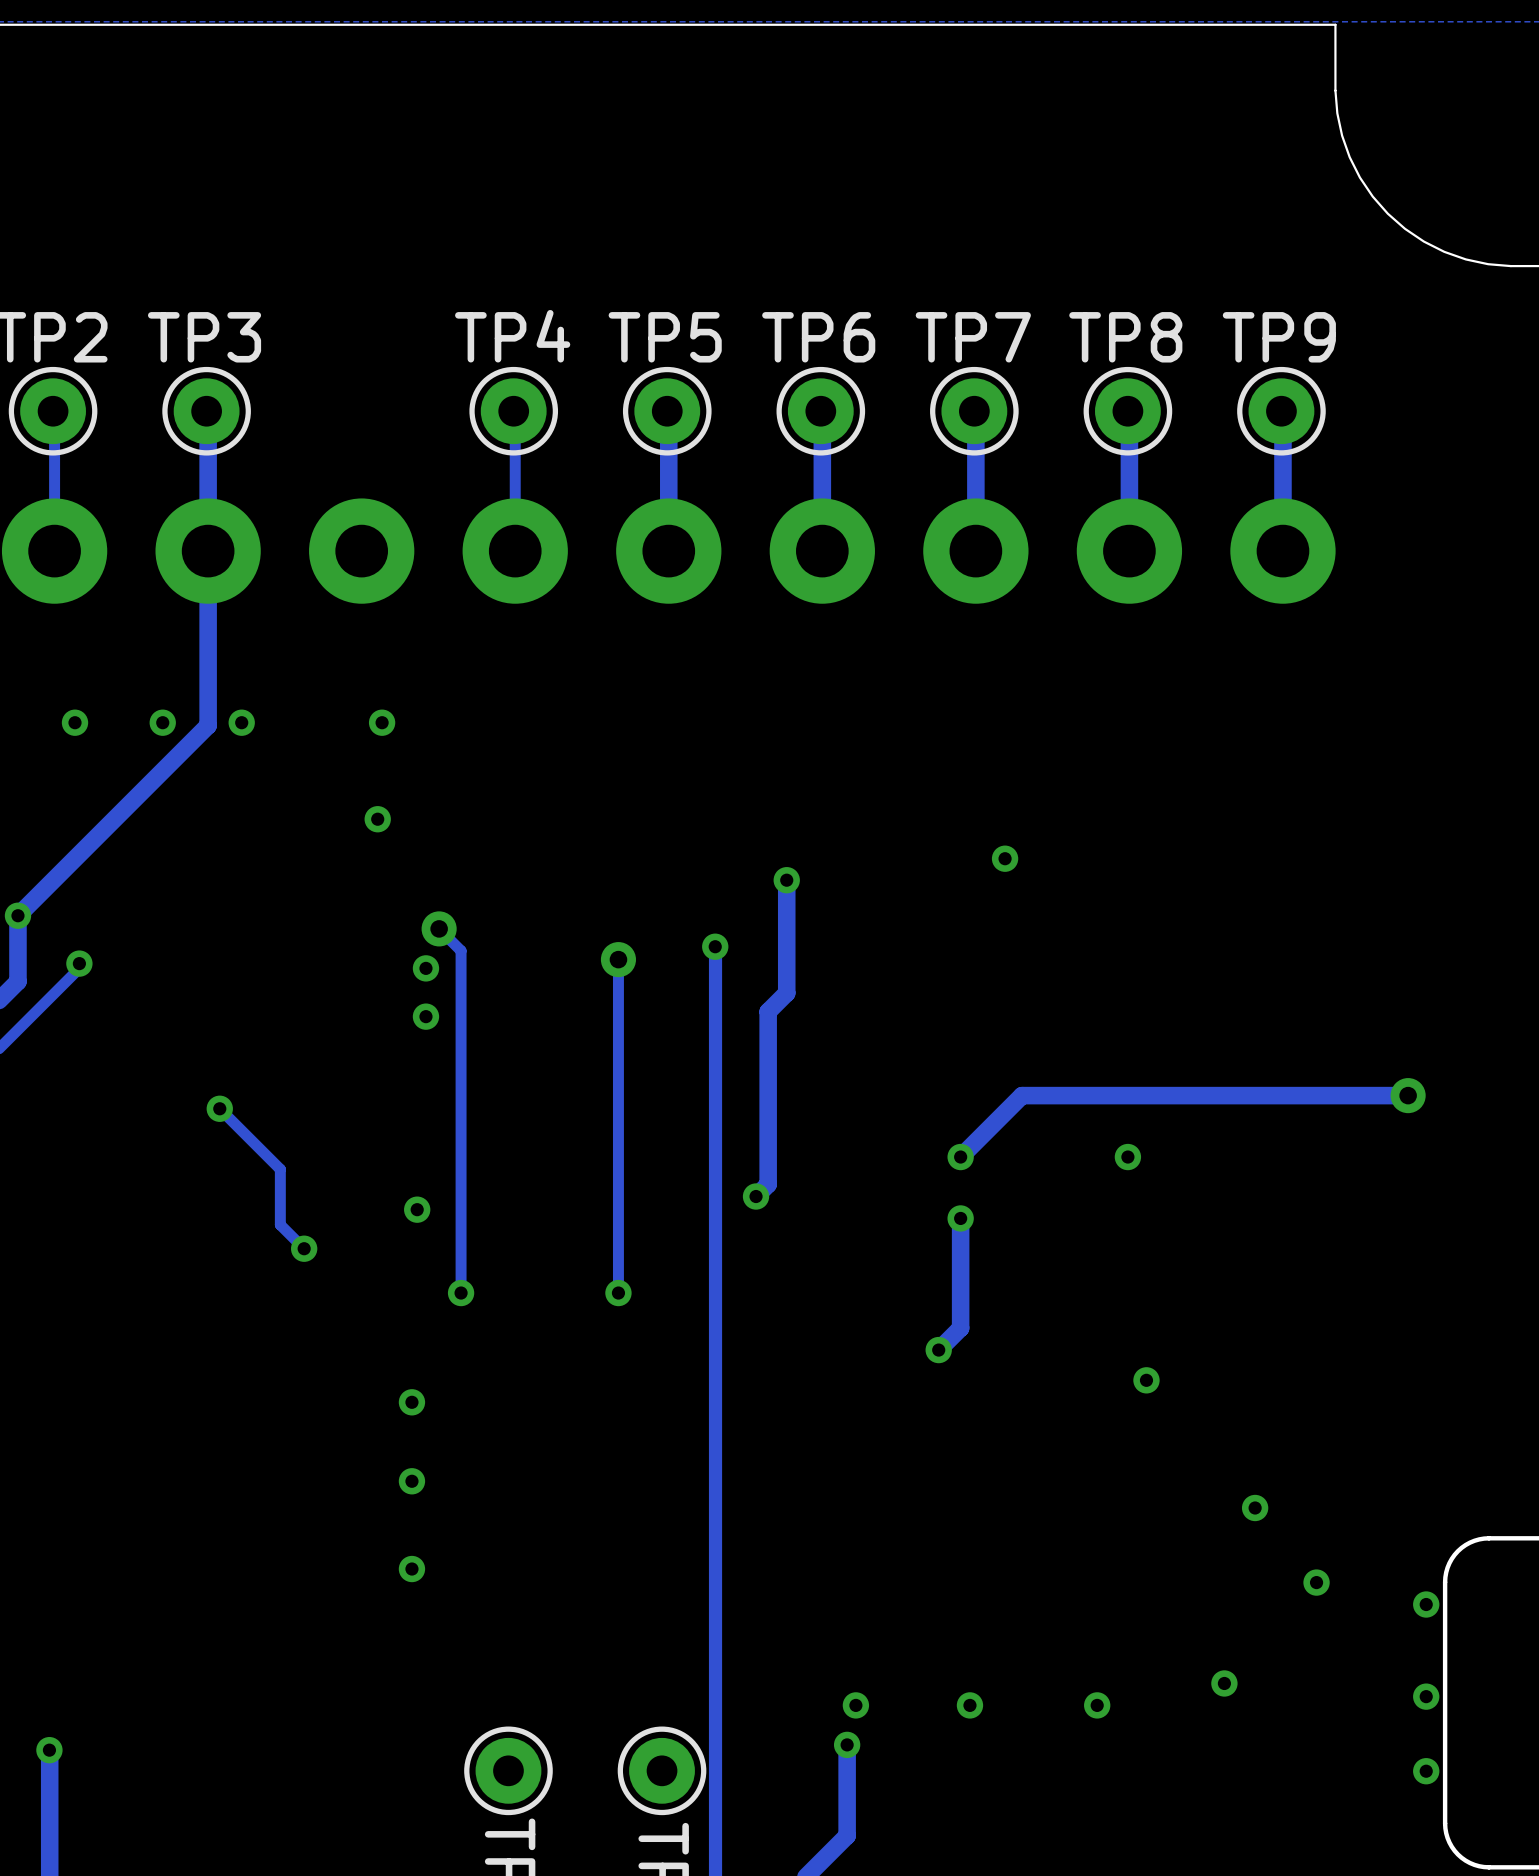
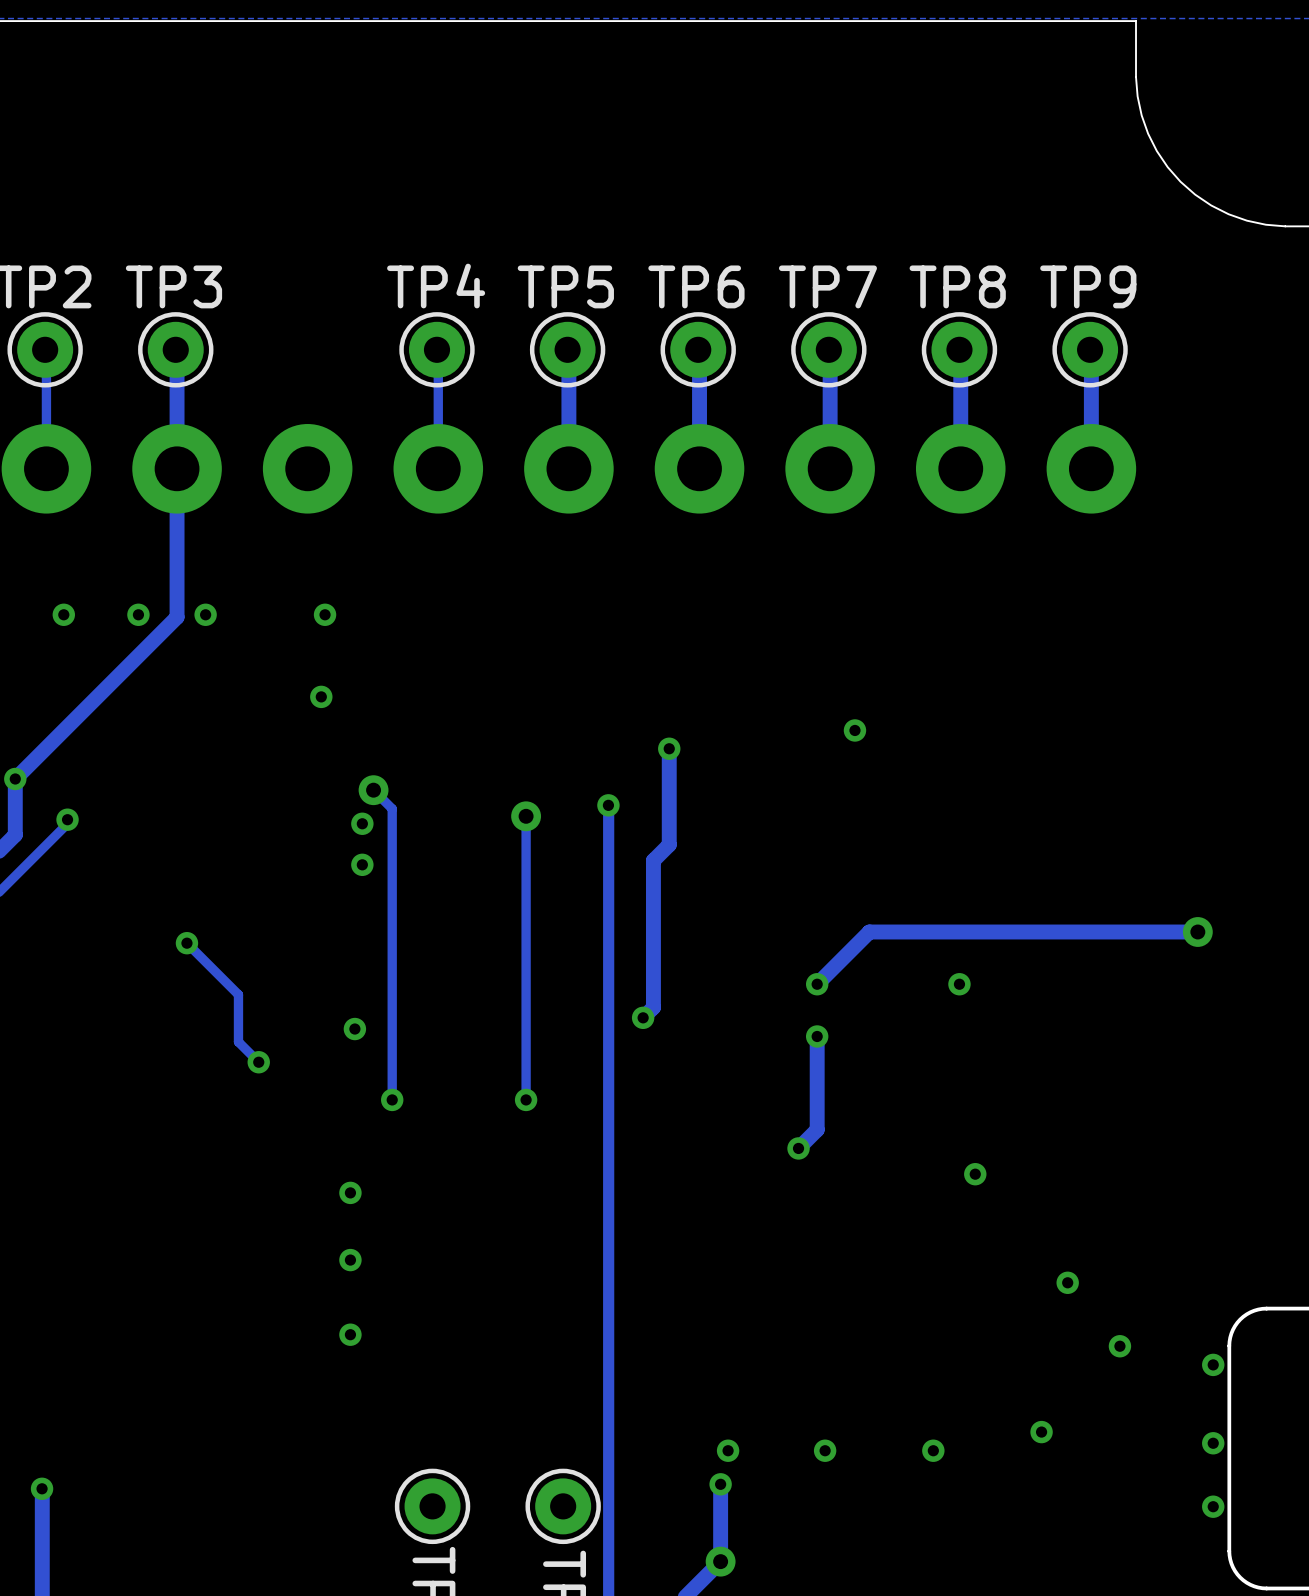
via: none -> (720, 1561)

